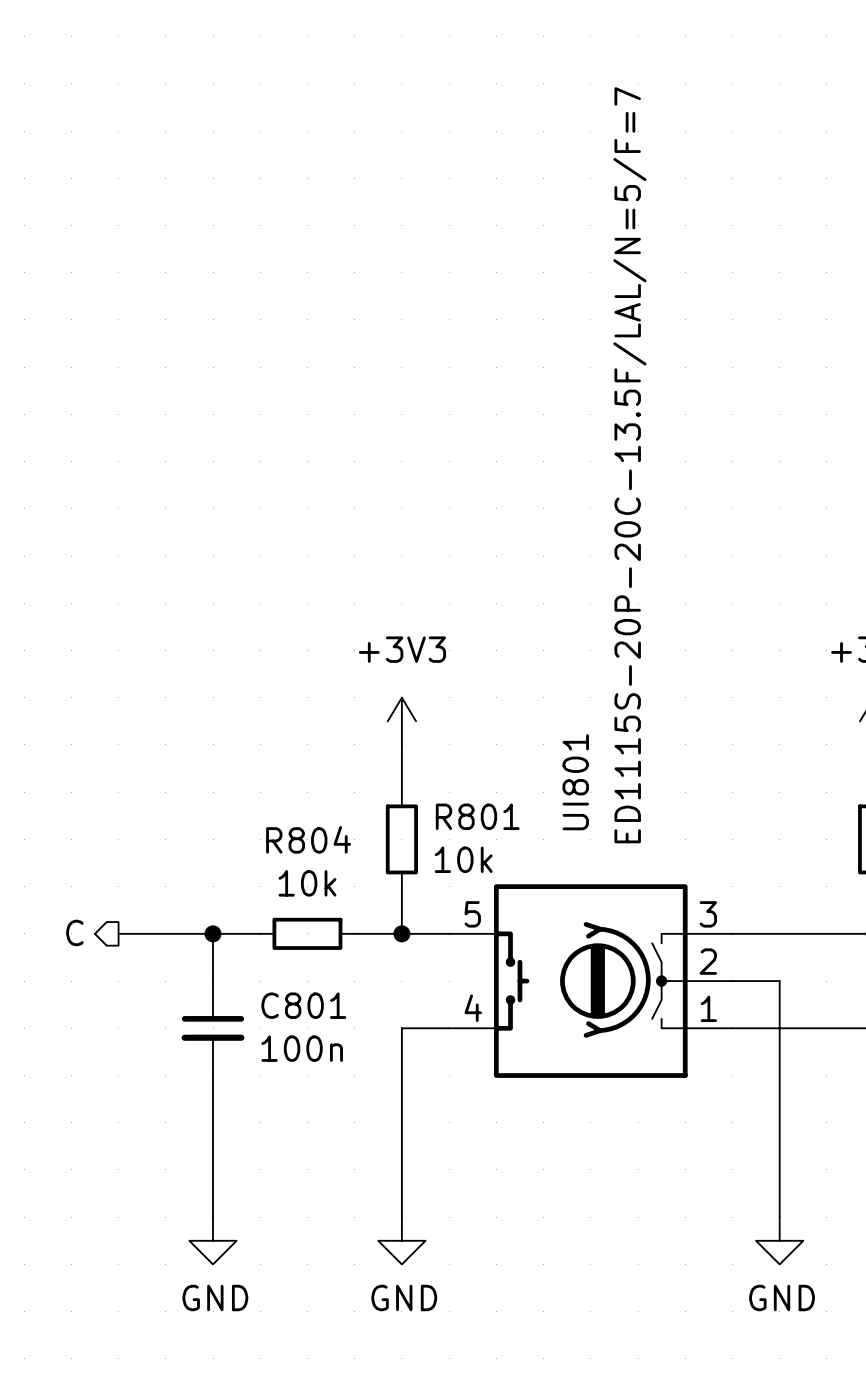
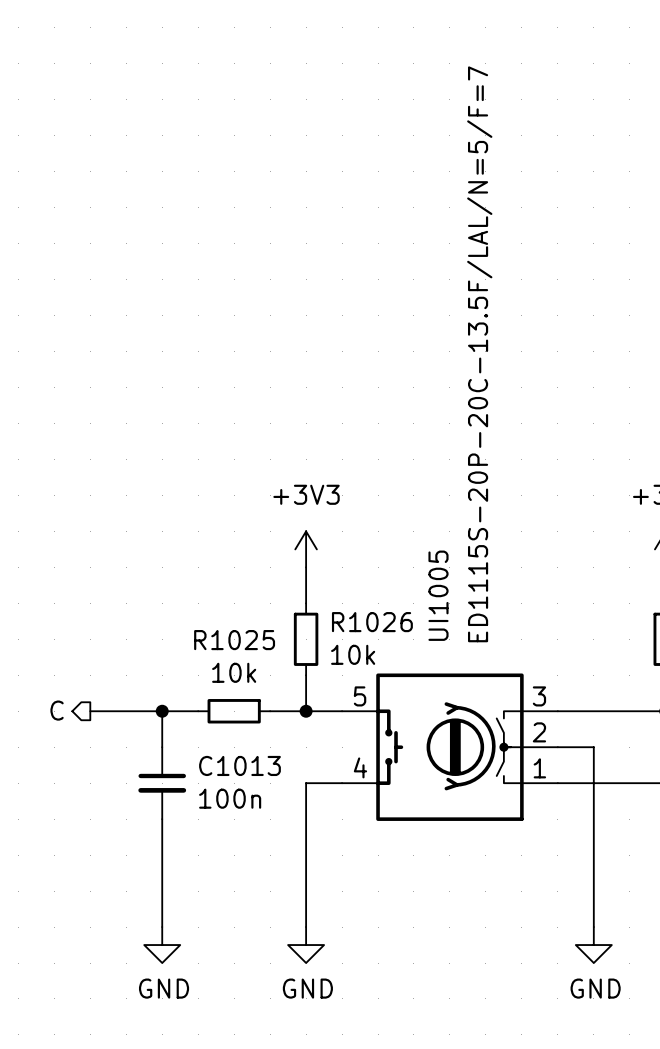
UI801 name: UI801 (575, 782) -> UI1005 (438, 595)
R801 name: R801 (477, 816) -> R1026 (372, 622)
R804 name: R804 (308, 839) -> R1025 (234, 640)
C801 name: C801 (303, 1005) -> C1013 (239, 765)

